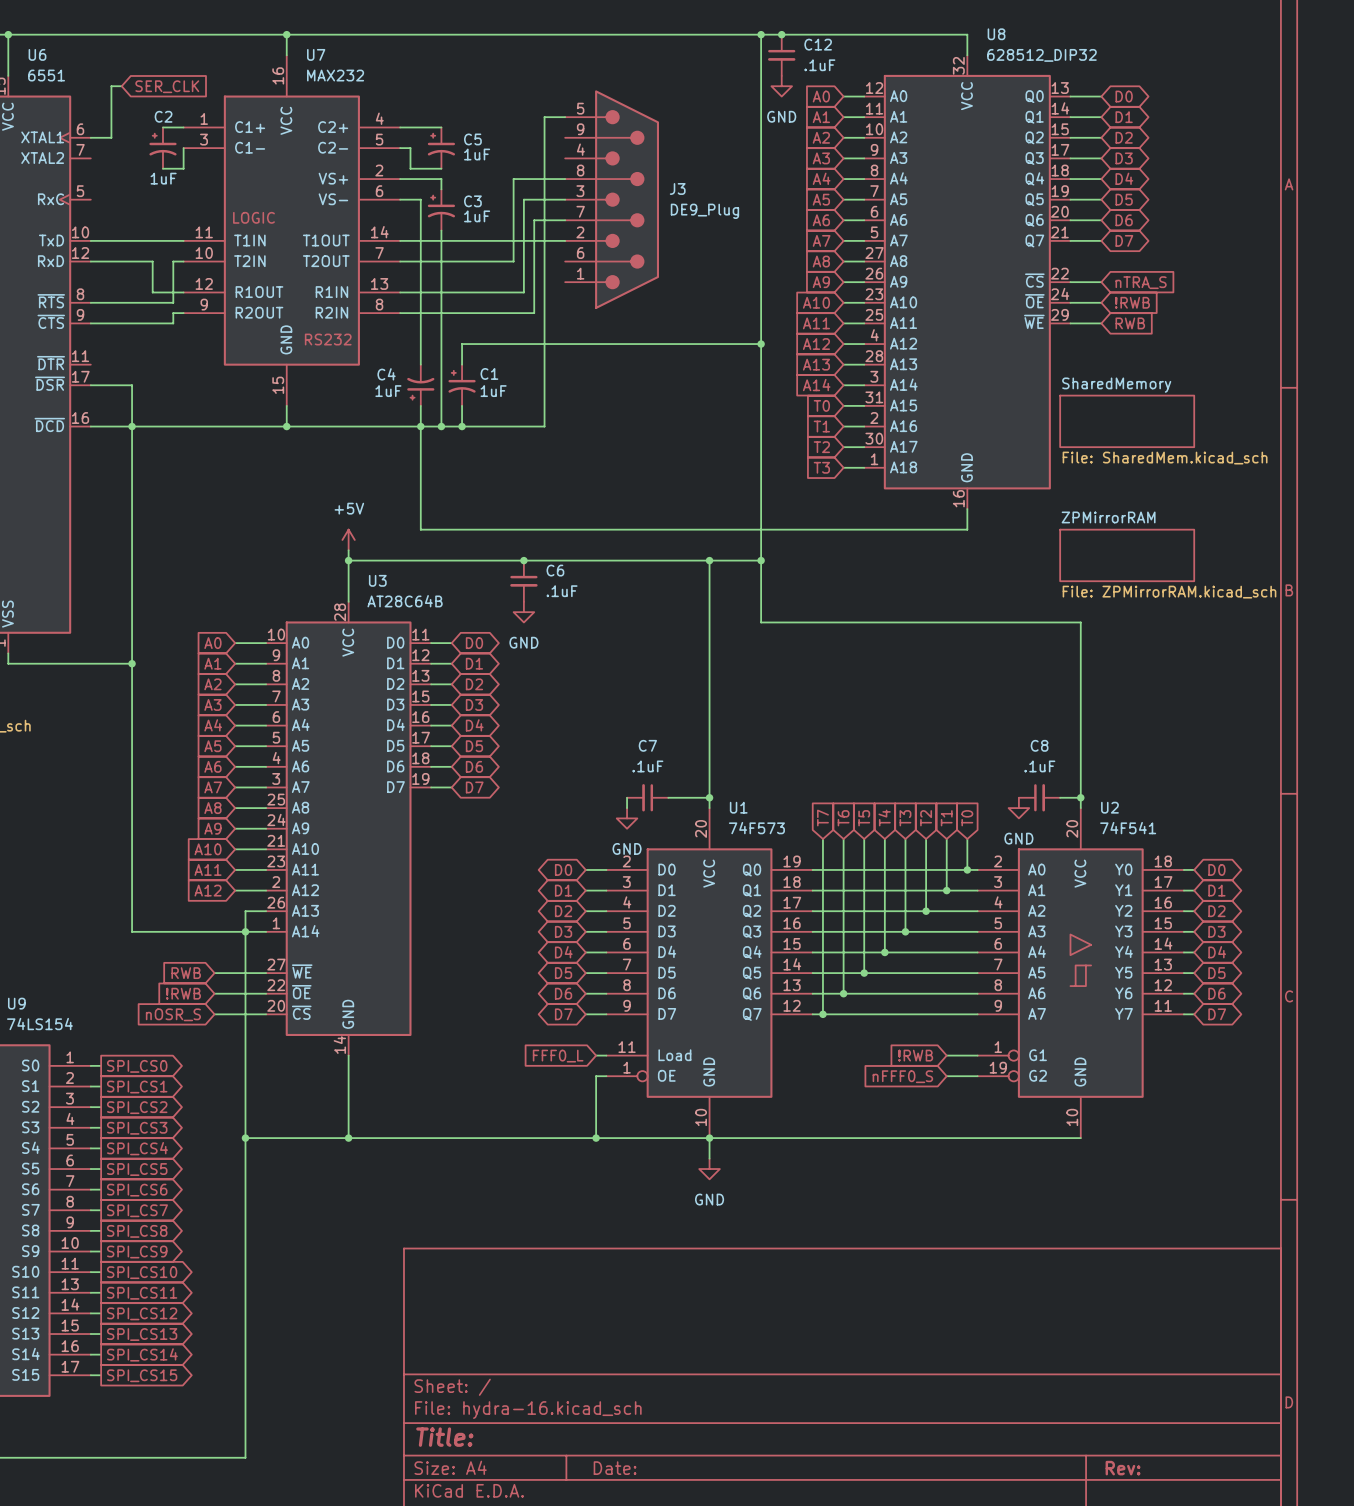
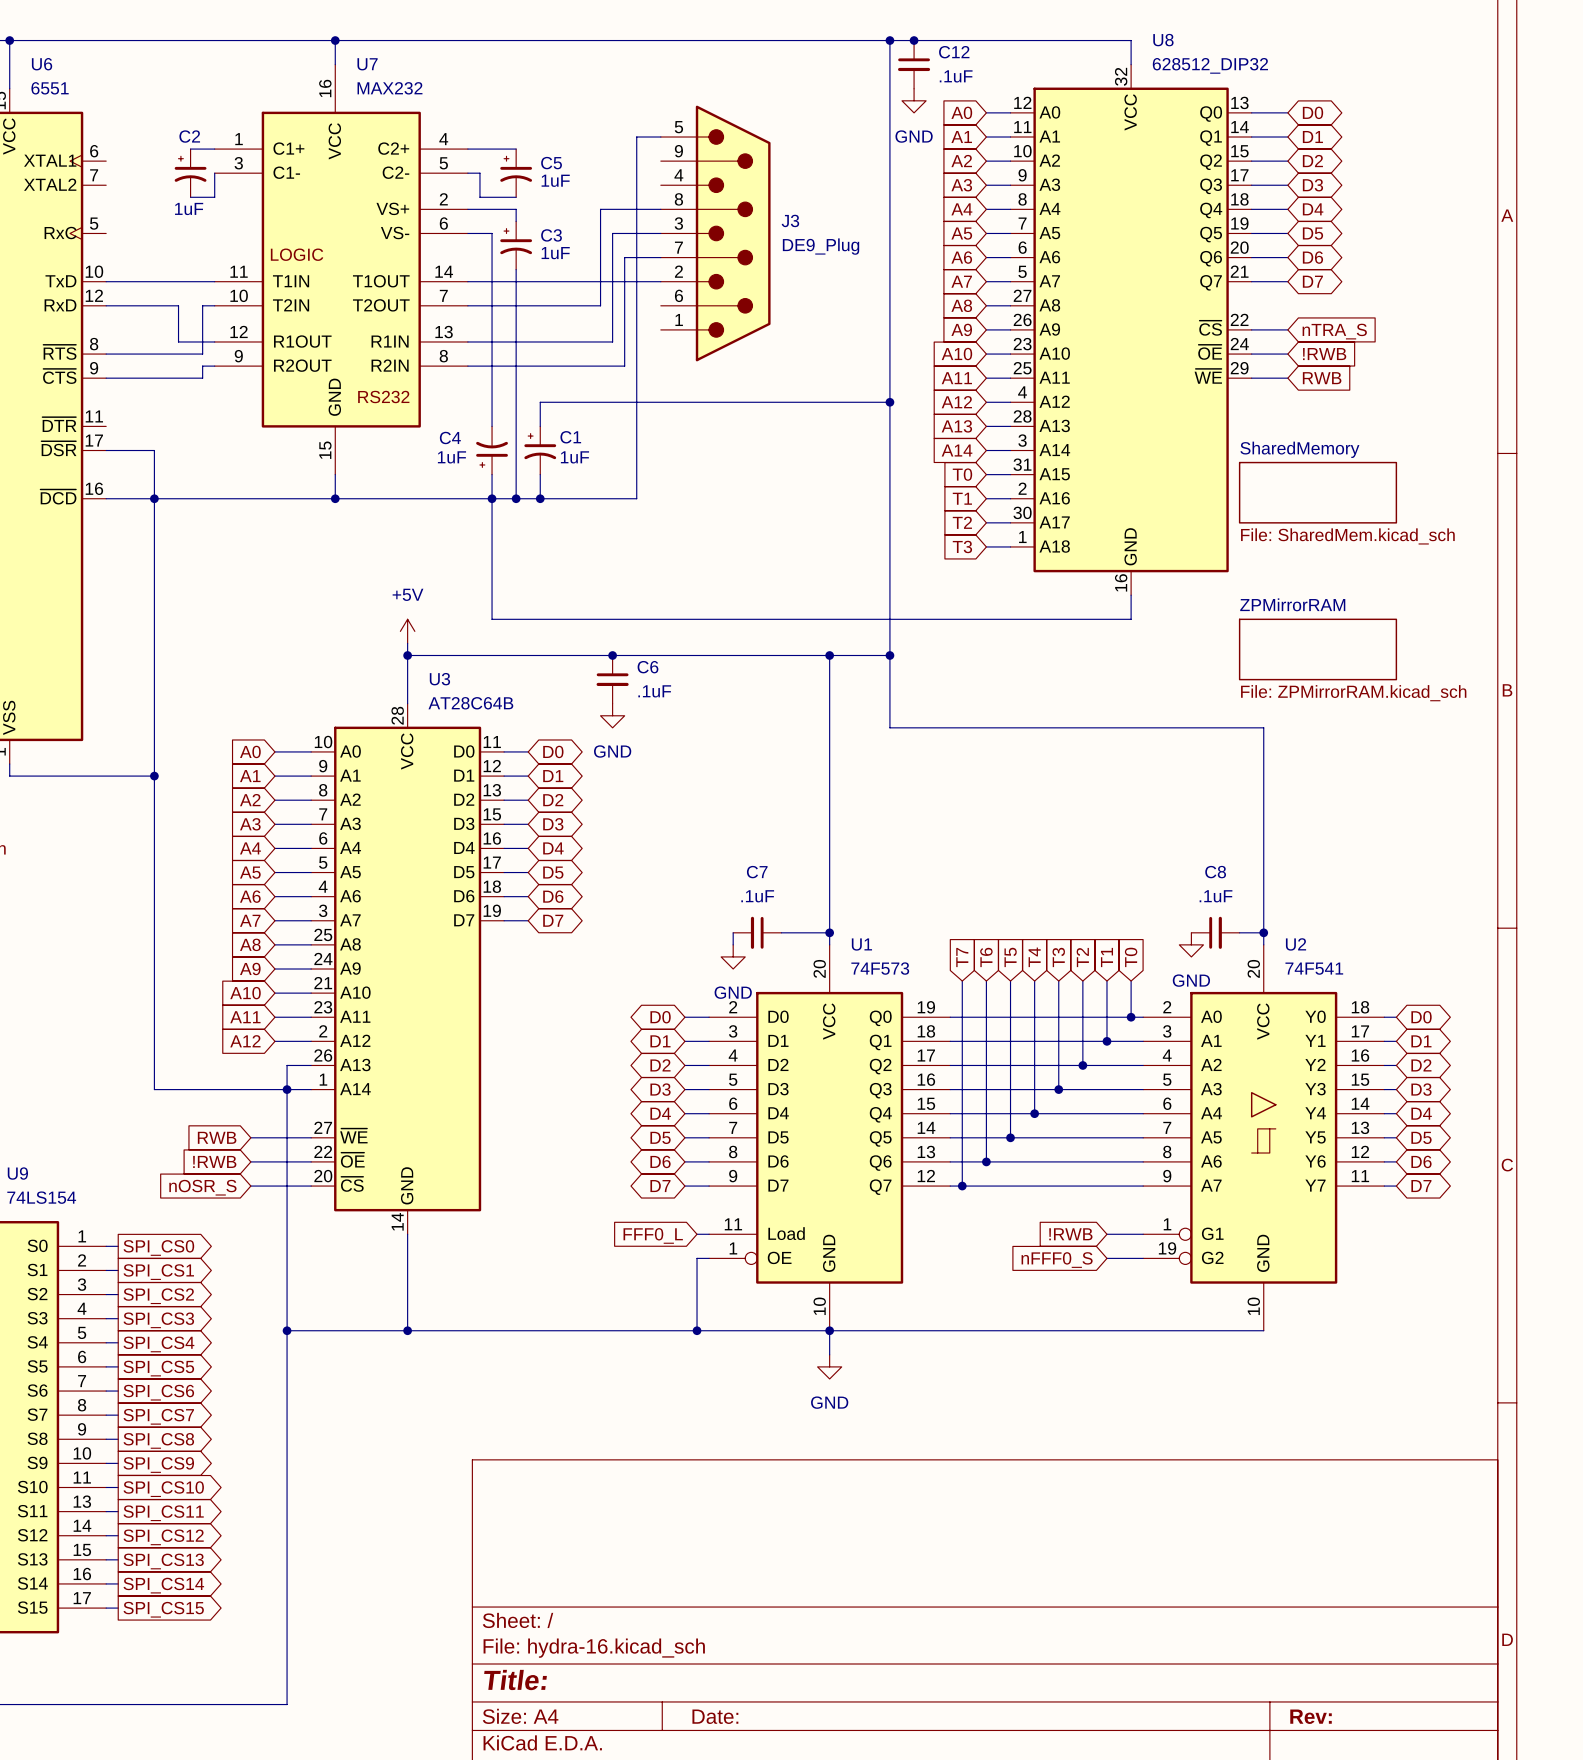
wire: (121, 86) (111, 86) (111, 137) (90, 137) -> none
global label: SER_CLK (167, 86) -> none

